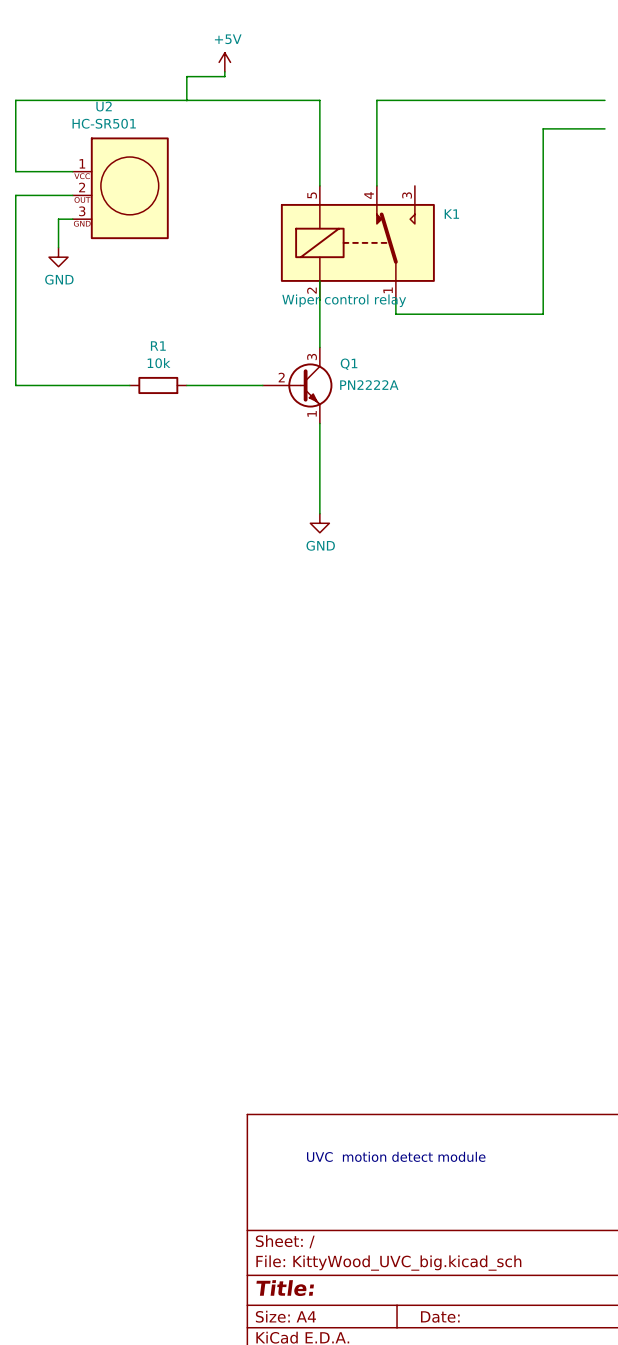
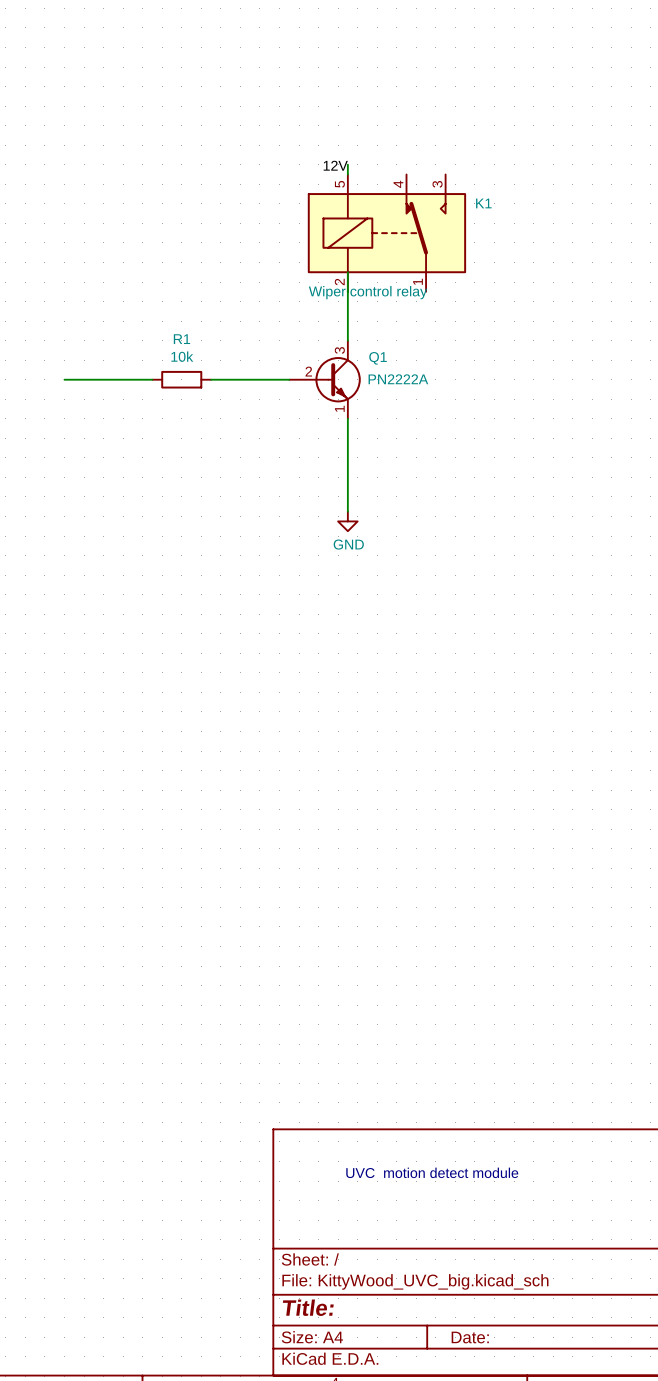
power symbol: +5V (224, 62) -> none
wire: (224, 71) (224, 76) (186, 76) (186, 100) -> none
wire: (604, 100) (376, 100) (376, 185) -> none
wire: (604, 128) (543, 128) (543, 314) (395, 314) (395, 299) -> none
wire: (72, 171) (15, 171) (15, 100) (319, 100) (319, 176) -> none
label: none -> 12V (335, 165)
U2: HC-SR501 (120, 188) -> none
wire: (72, 195) (15, 195) (15, 385) (44, 385) -> none
wire: (72, 219) (58, 219) (58, 247) -> none
power symbol: GND (58, 257) -> none

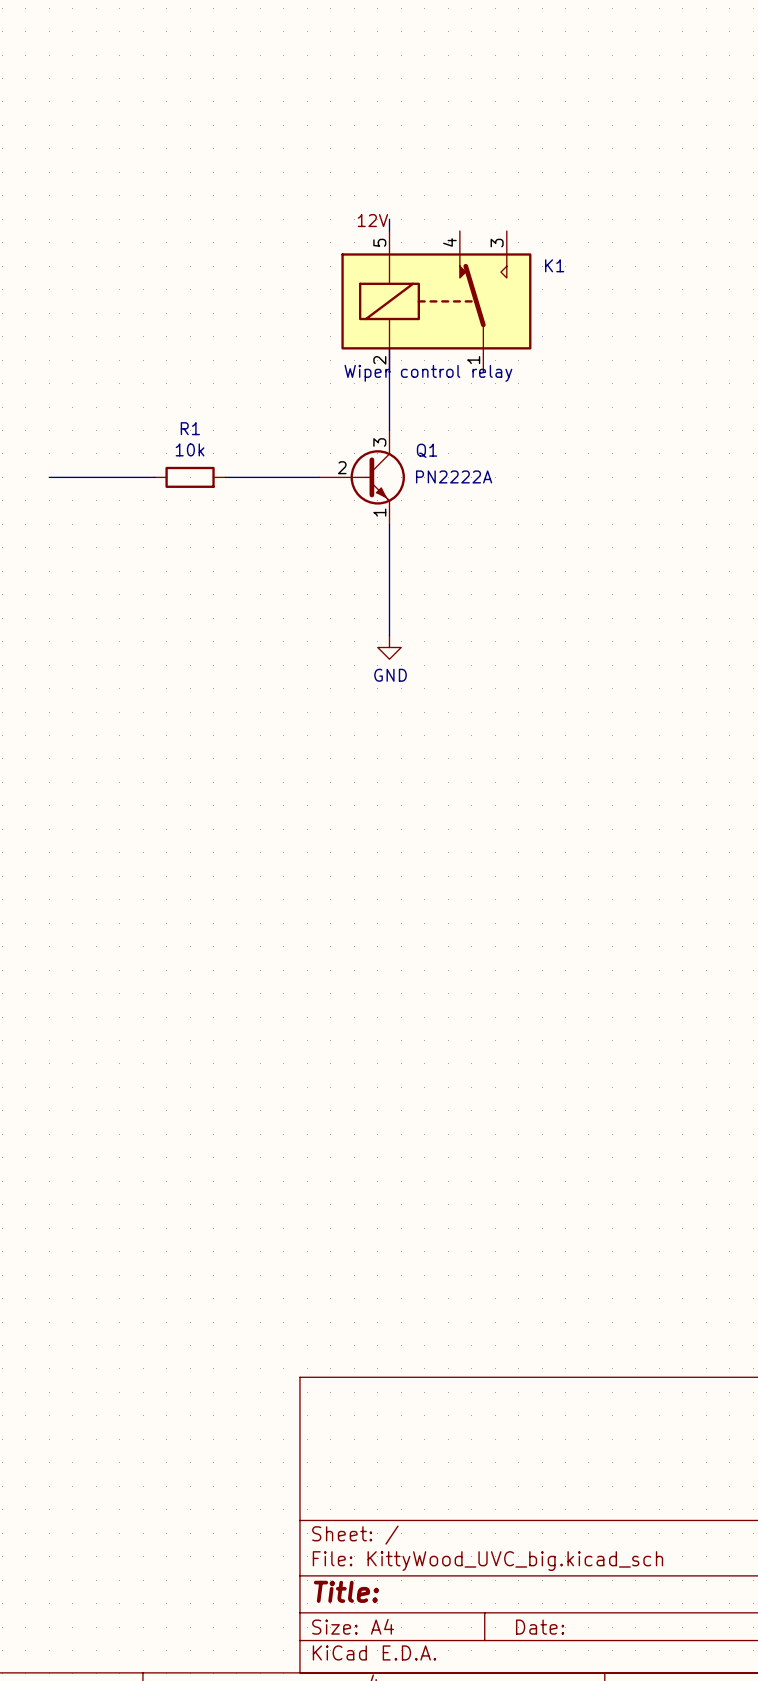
text: UVC motion detect module (432, 1172) -> none

